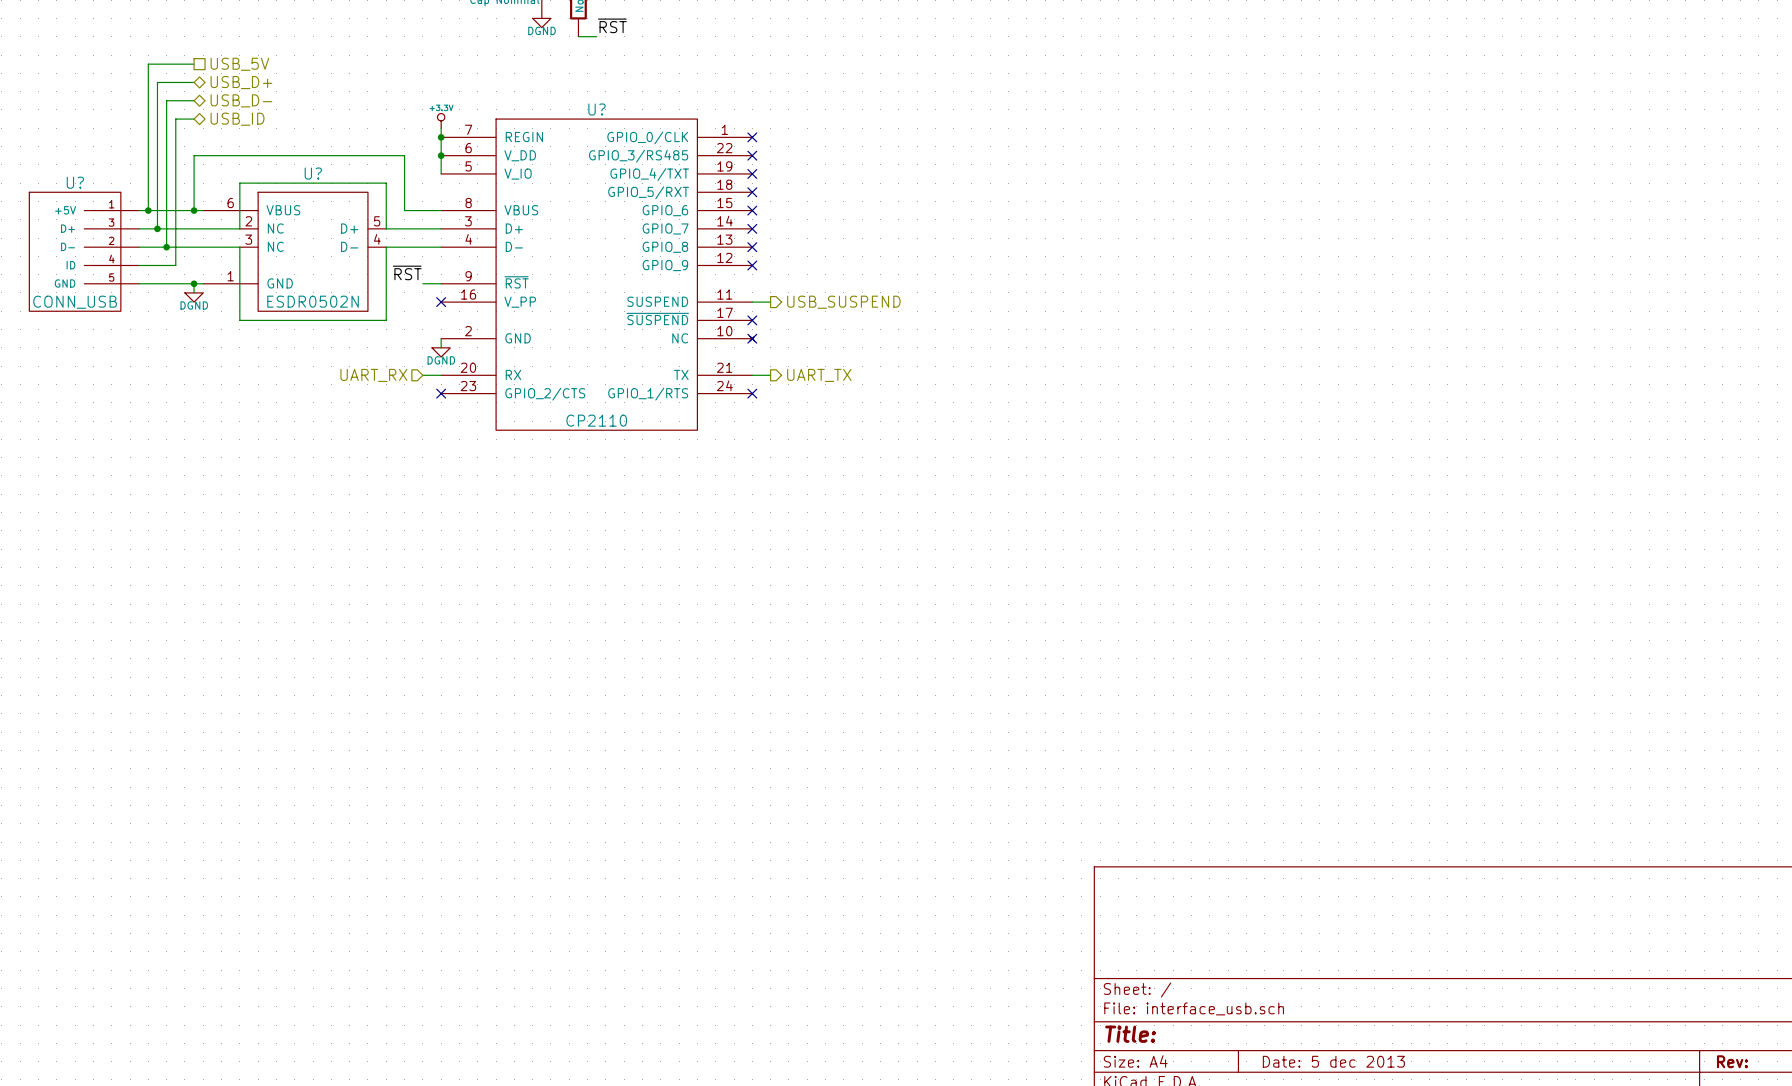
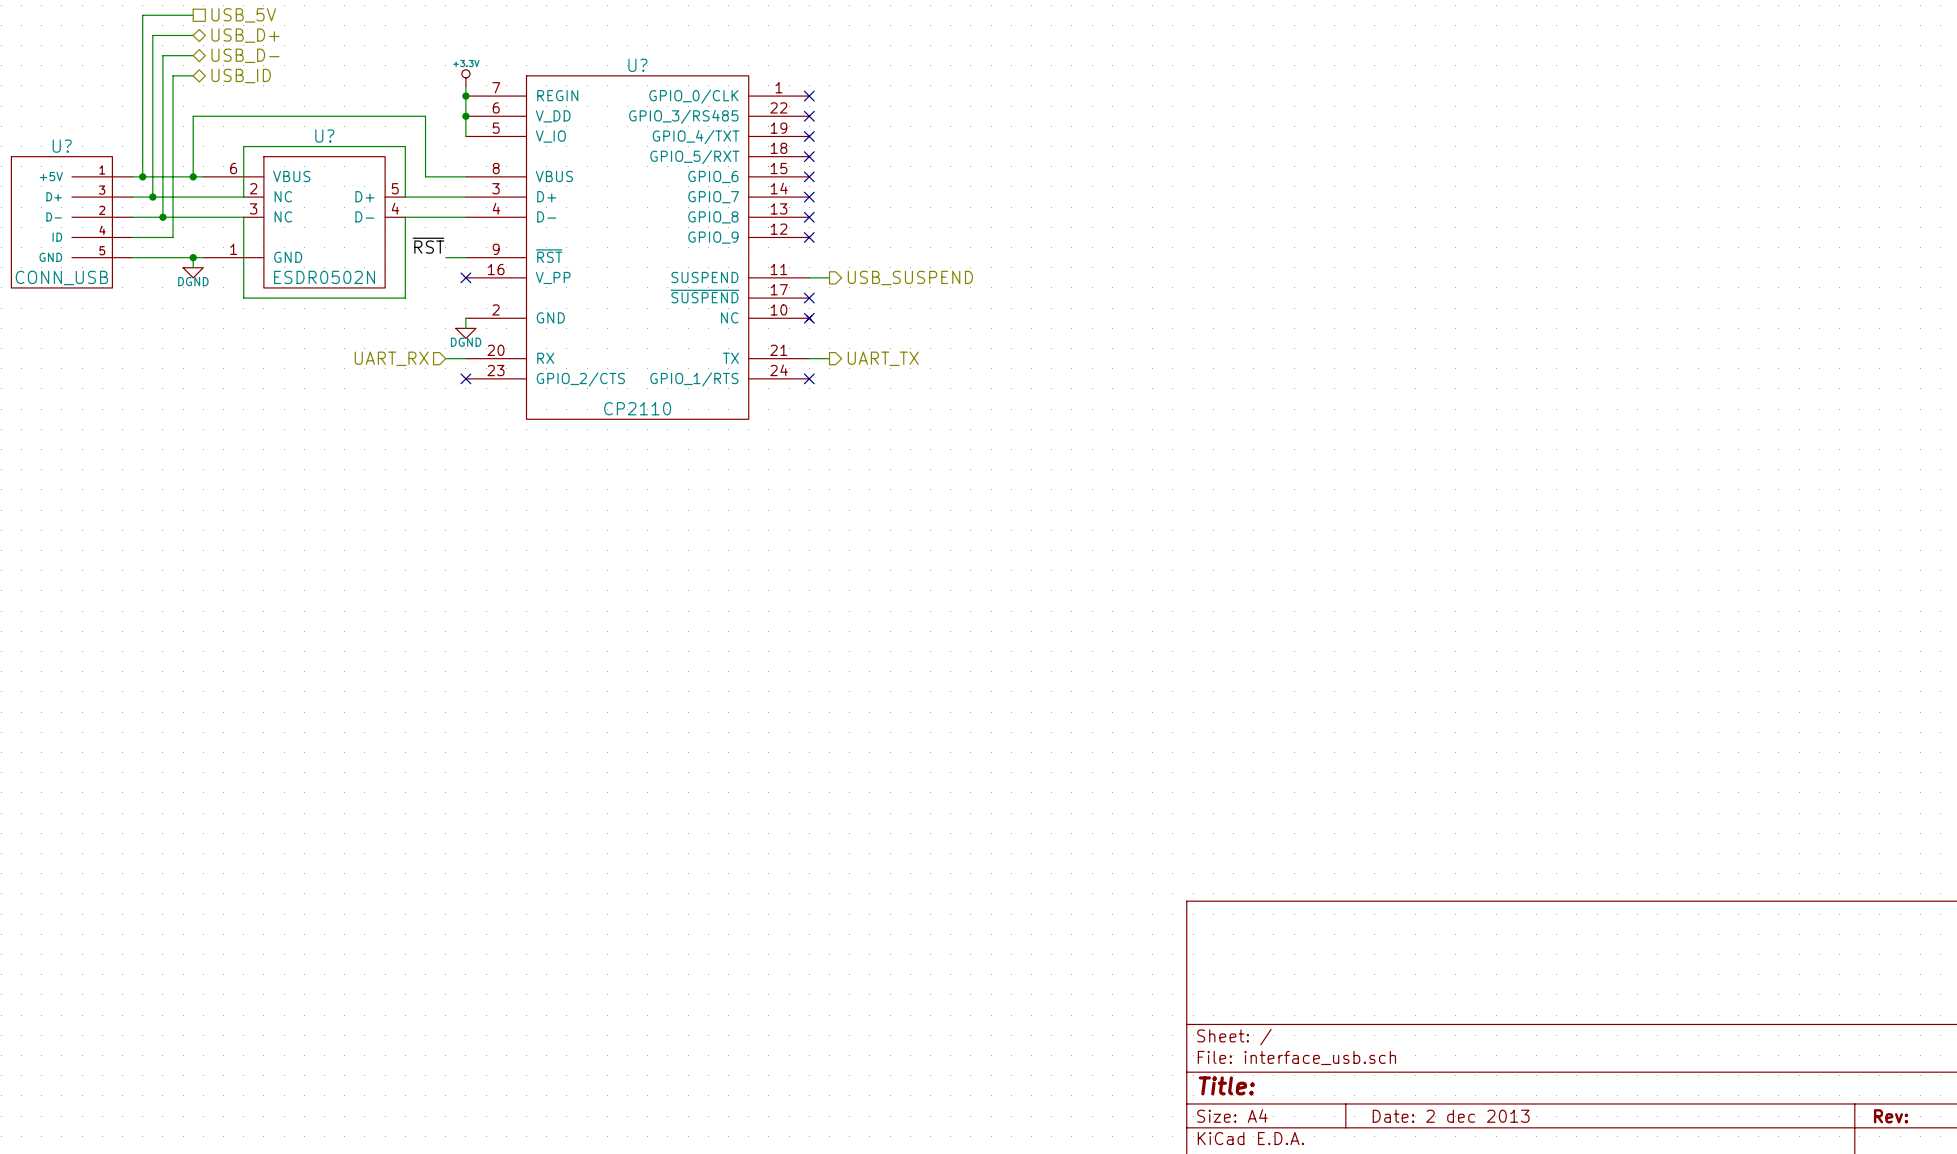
title block: Date: 5 dec 2013 (1333, 1061) -> Date: 2 dec 2013 (1451, 1116)

